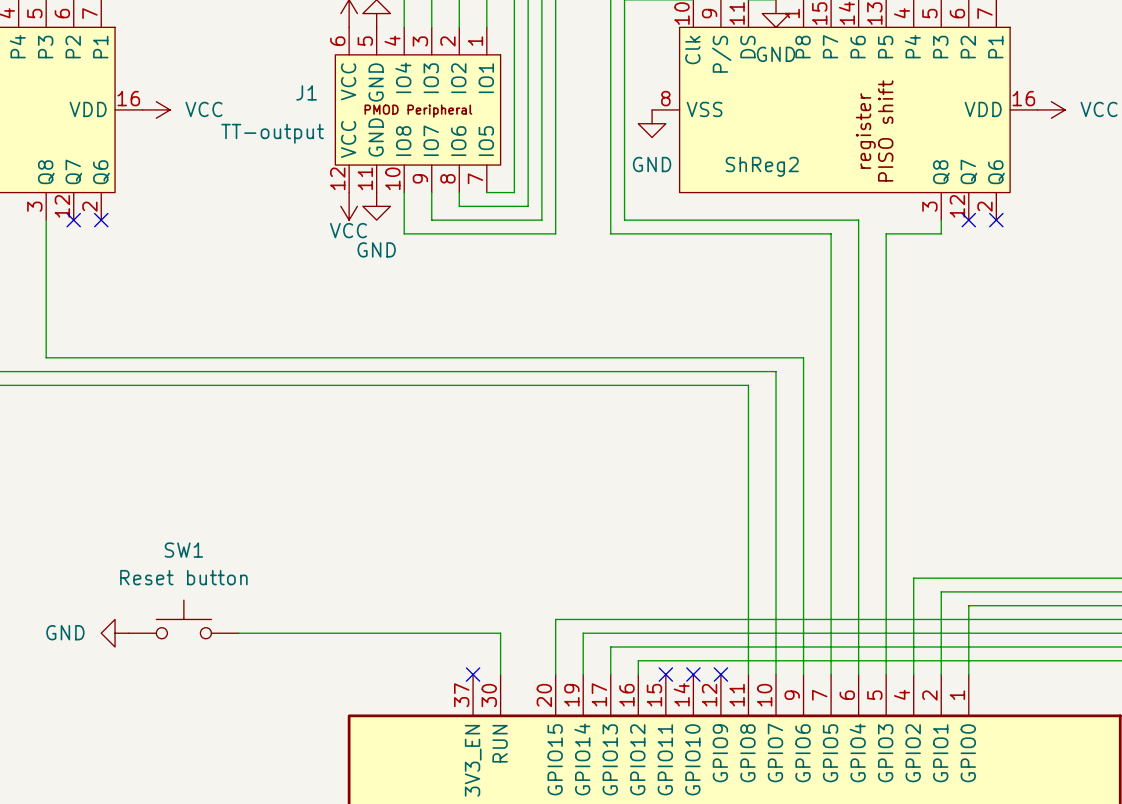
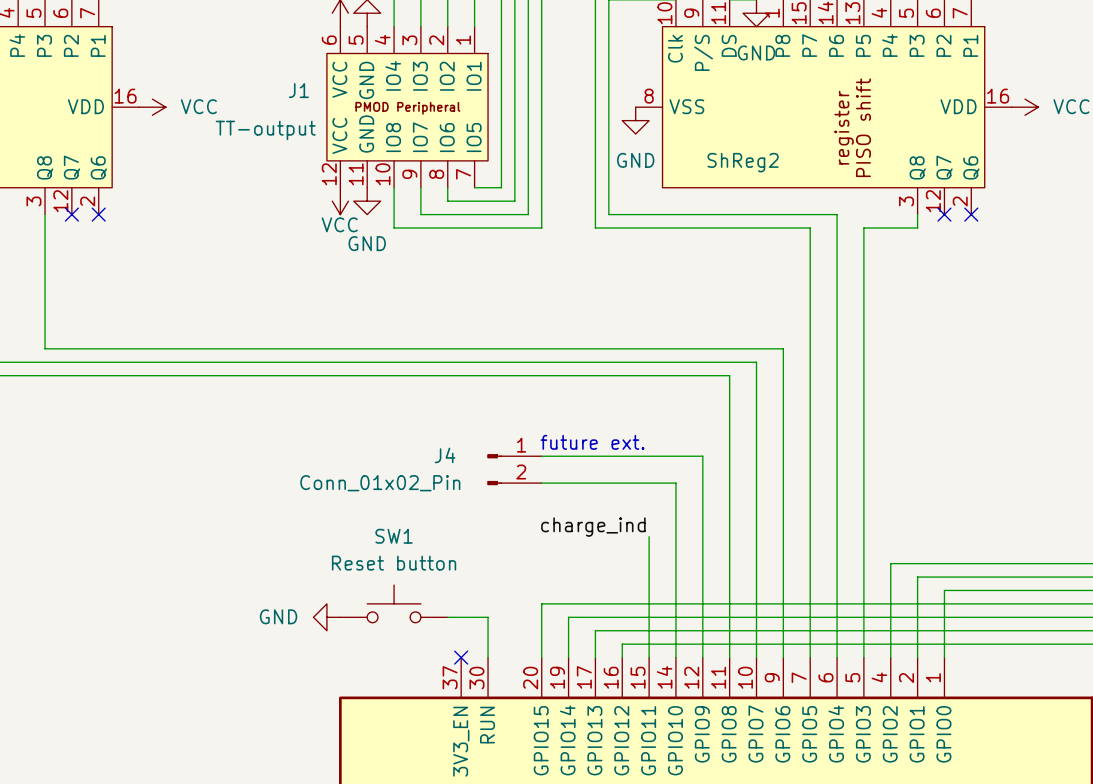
text: none -> future ext. (592, 442)
wire: none -> (541, 456) (702, 456) (702, 657)
J4: none -> Conn_01x02_Pin (514, 469)
wire: none -> (541, 483) (675, 483) (675, 657)
label: none -> charge_ind (593, 527)
wire: none -> (649, 536) (649, 657)
SW1 position: (183, 619) -> (394, 603)
power symbol position: GND (115, 633) -> GND (326, 617)
wire: (238, 633) (459, 633) -> none
no-connect mark: (665, 674) -> none
no-connect mark: (693, 674) -> none
no-connect mark: (720, 674) -> none

